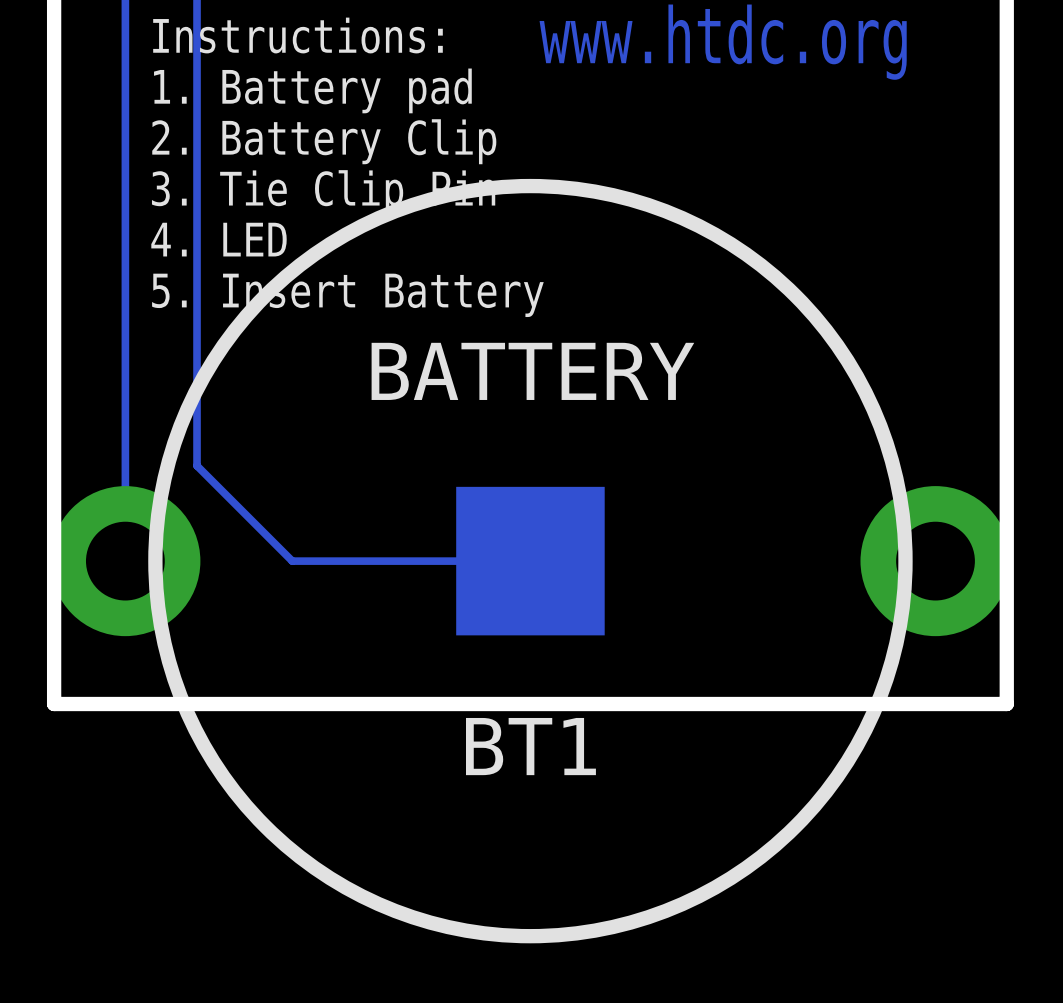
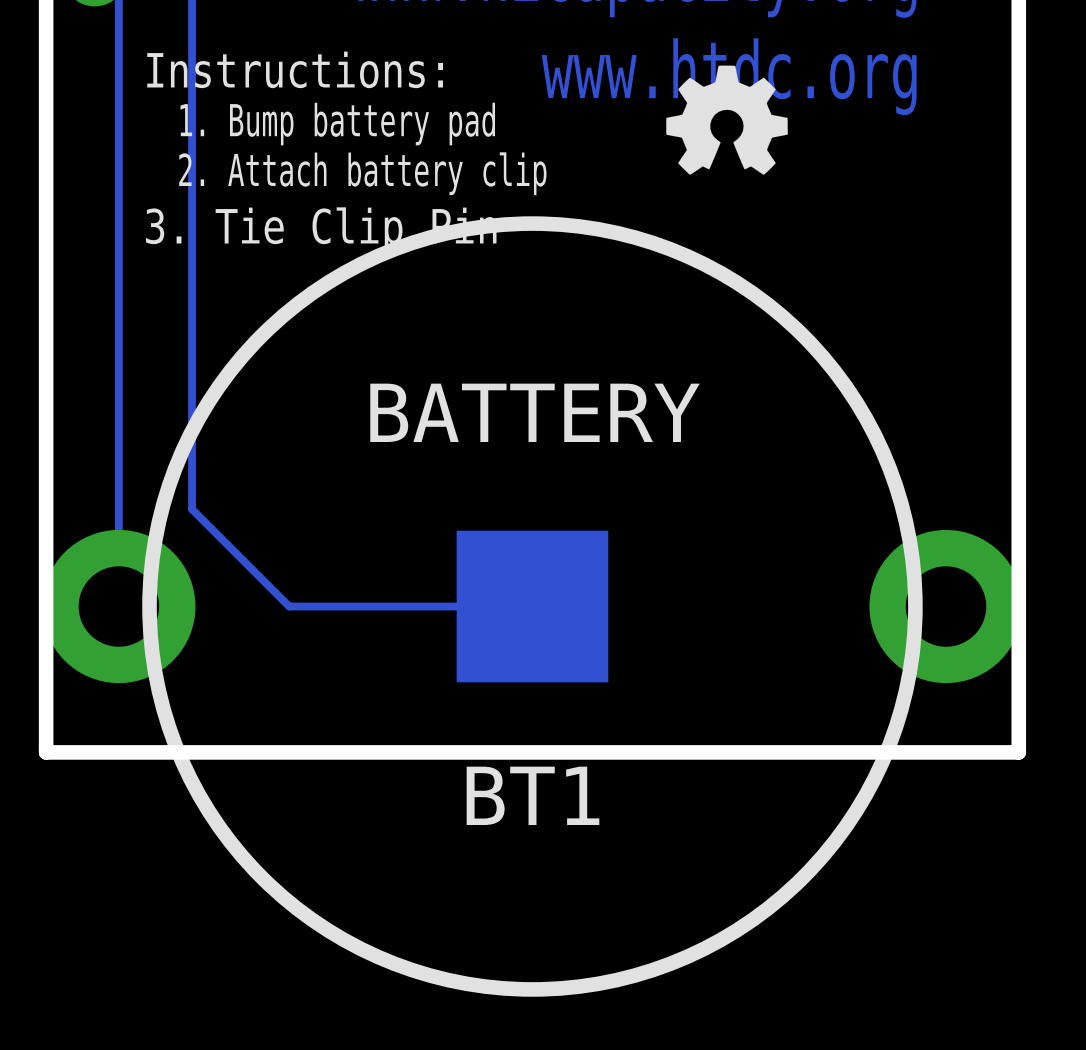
drawing: none -> [666, 65, 788, 175]
text: 1. Battery pad (312, 90) -> 1. Bump battery pad (337, 124)
text: 2. Battery Clip (324, 141) -> 2. Attach battery clip (362, 173)
text: 4. LED (219, 239) -> none
text: 5. Insert Battery (347, 295) -> none

